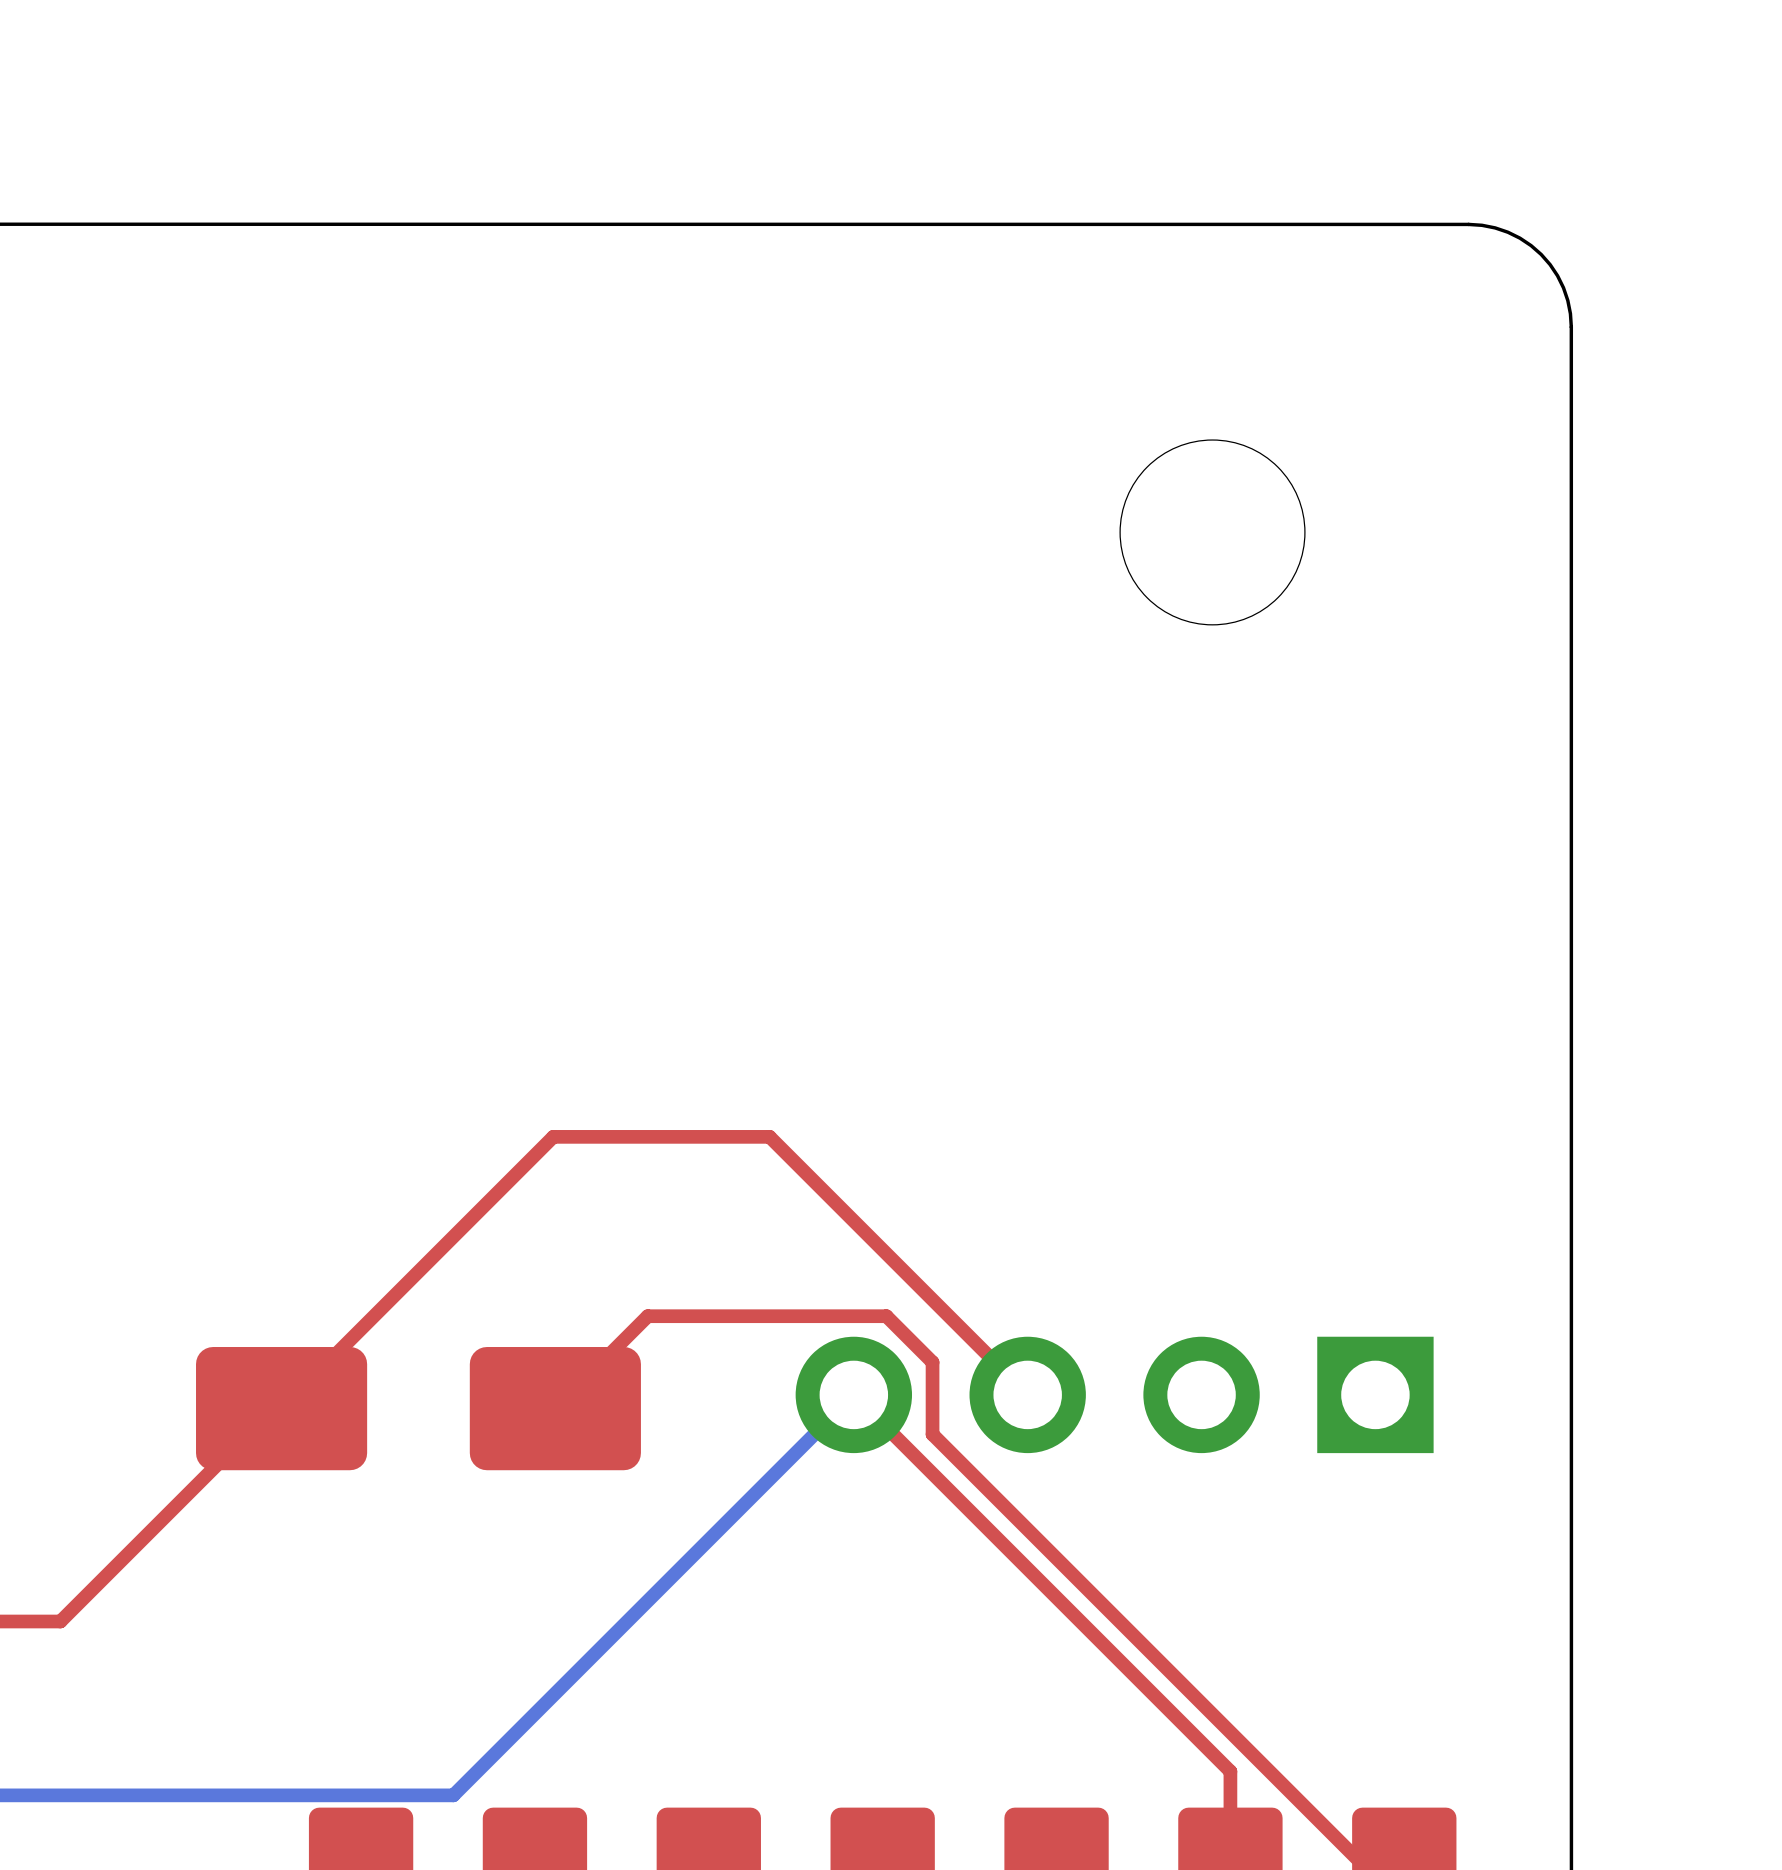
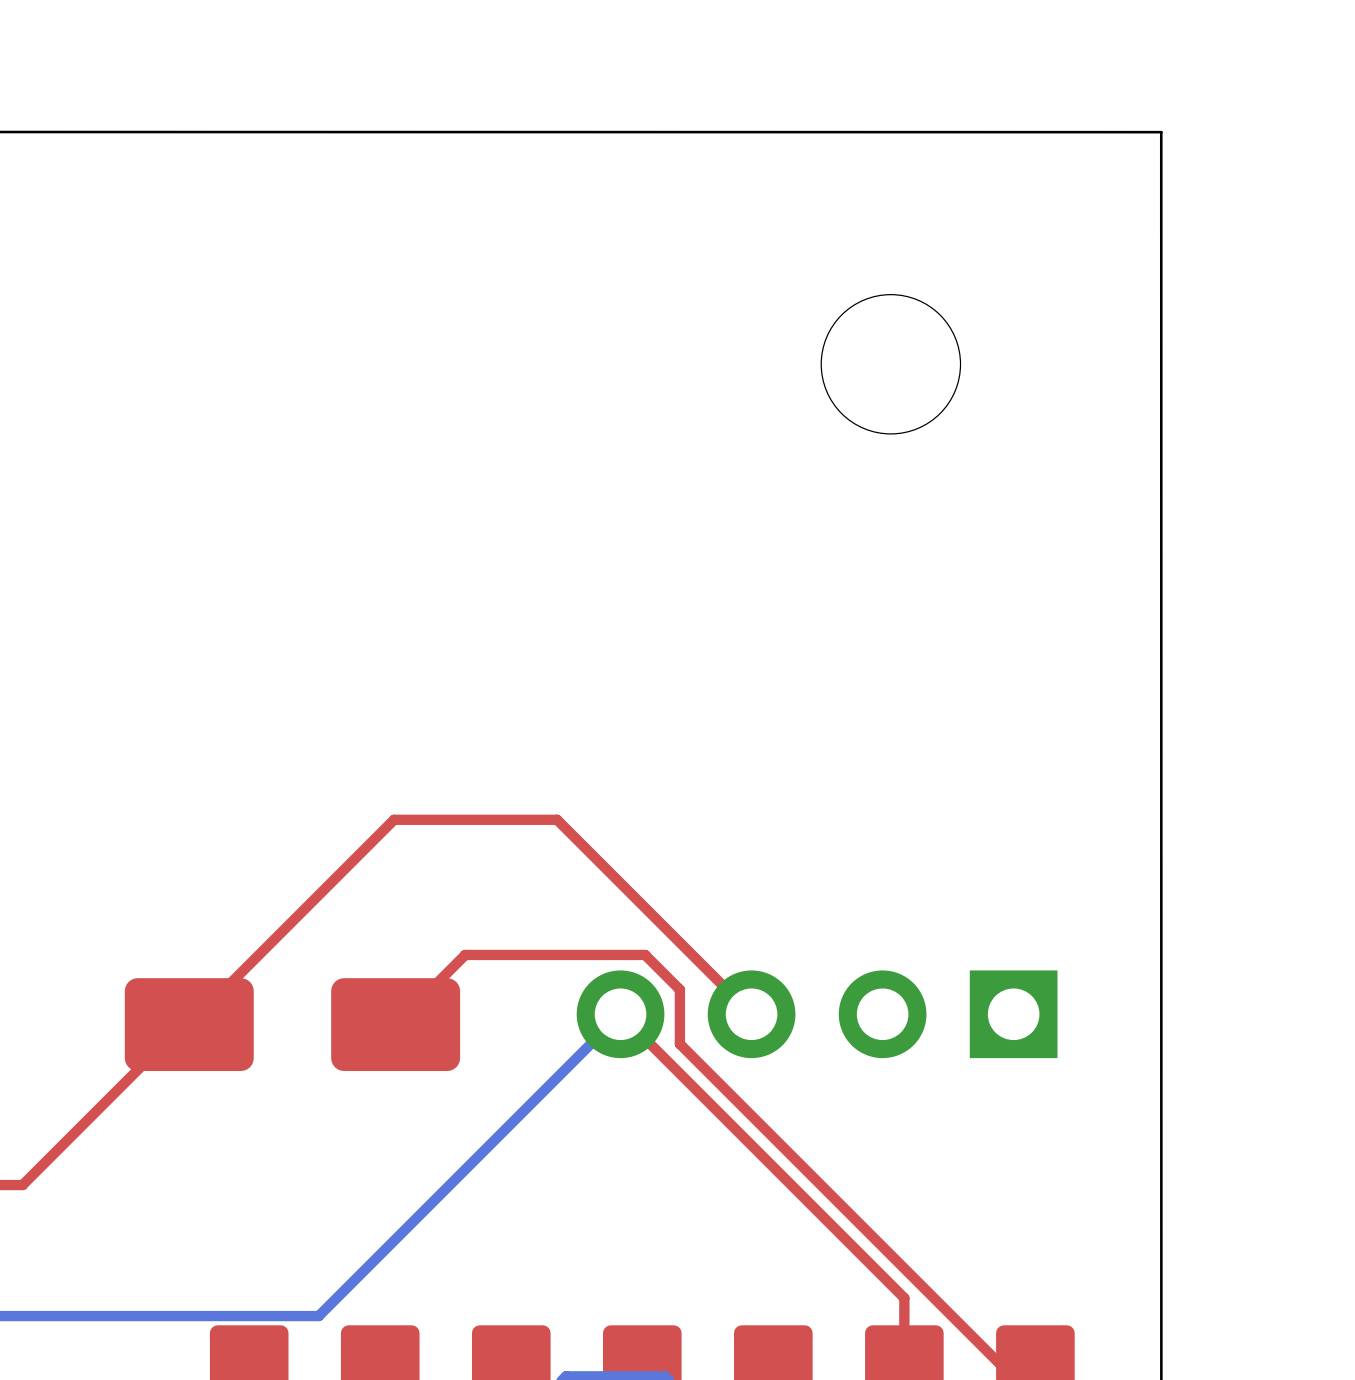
board edge: (1468, 224) (1482, 225) (1507, 232) (1519, 238) (1541, 254) (1557, 275) (1563, 287) (1570, 313) (1571, 327) -> (1083, 132) (1161, 132) (1161, 209)

